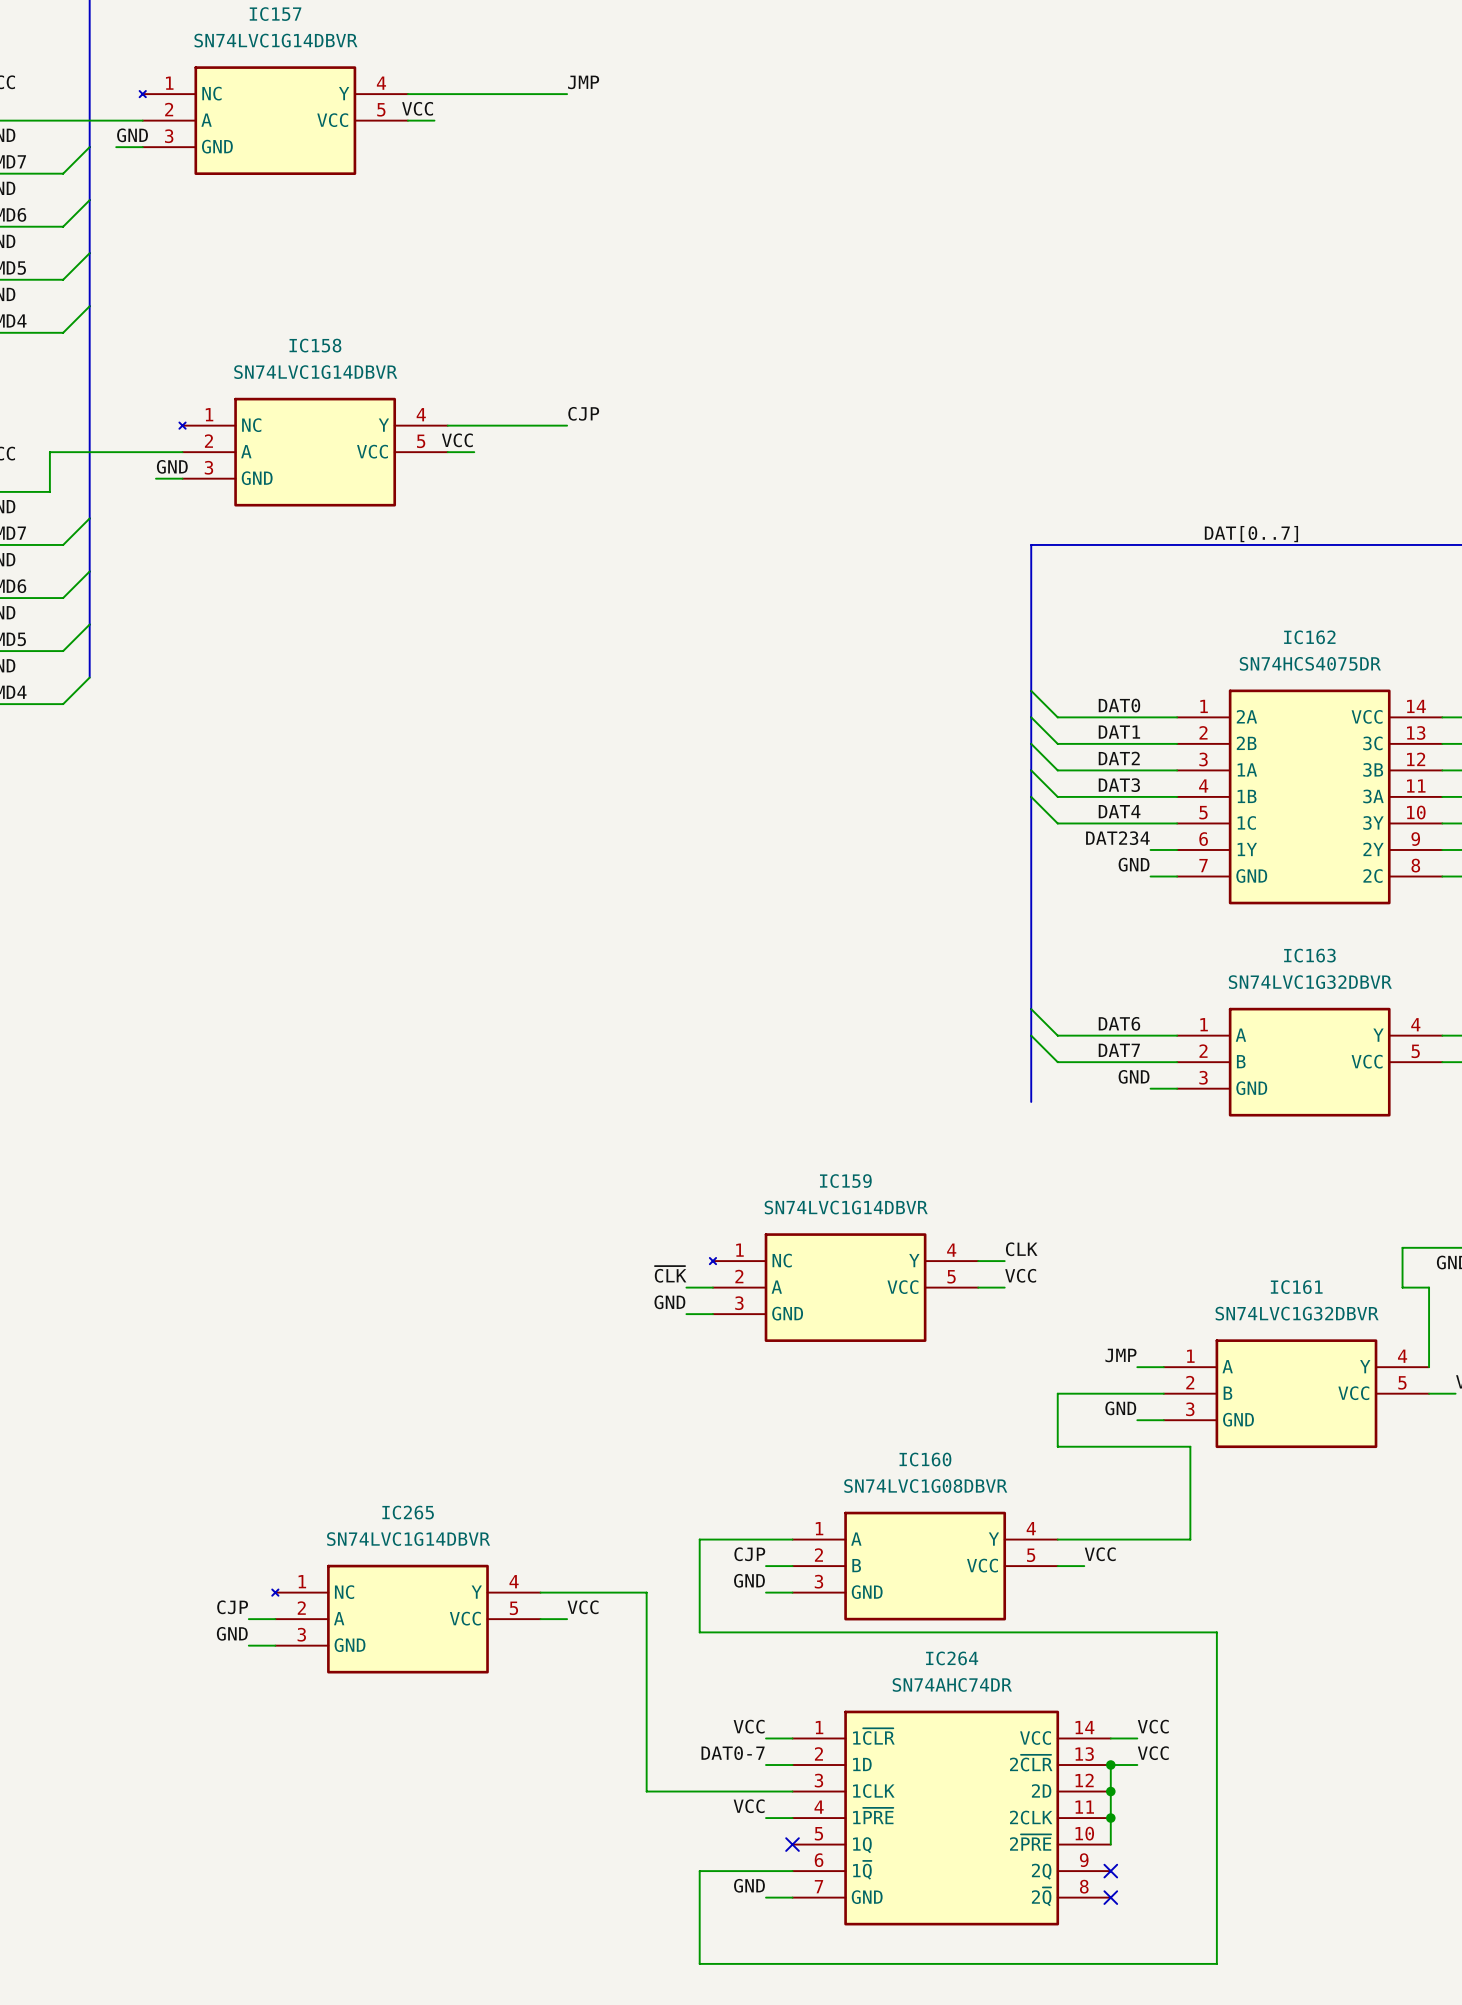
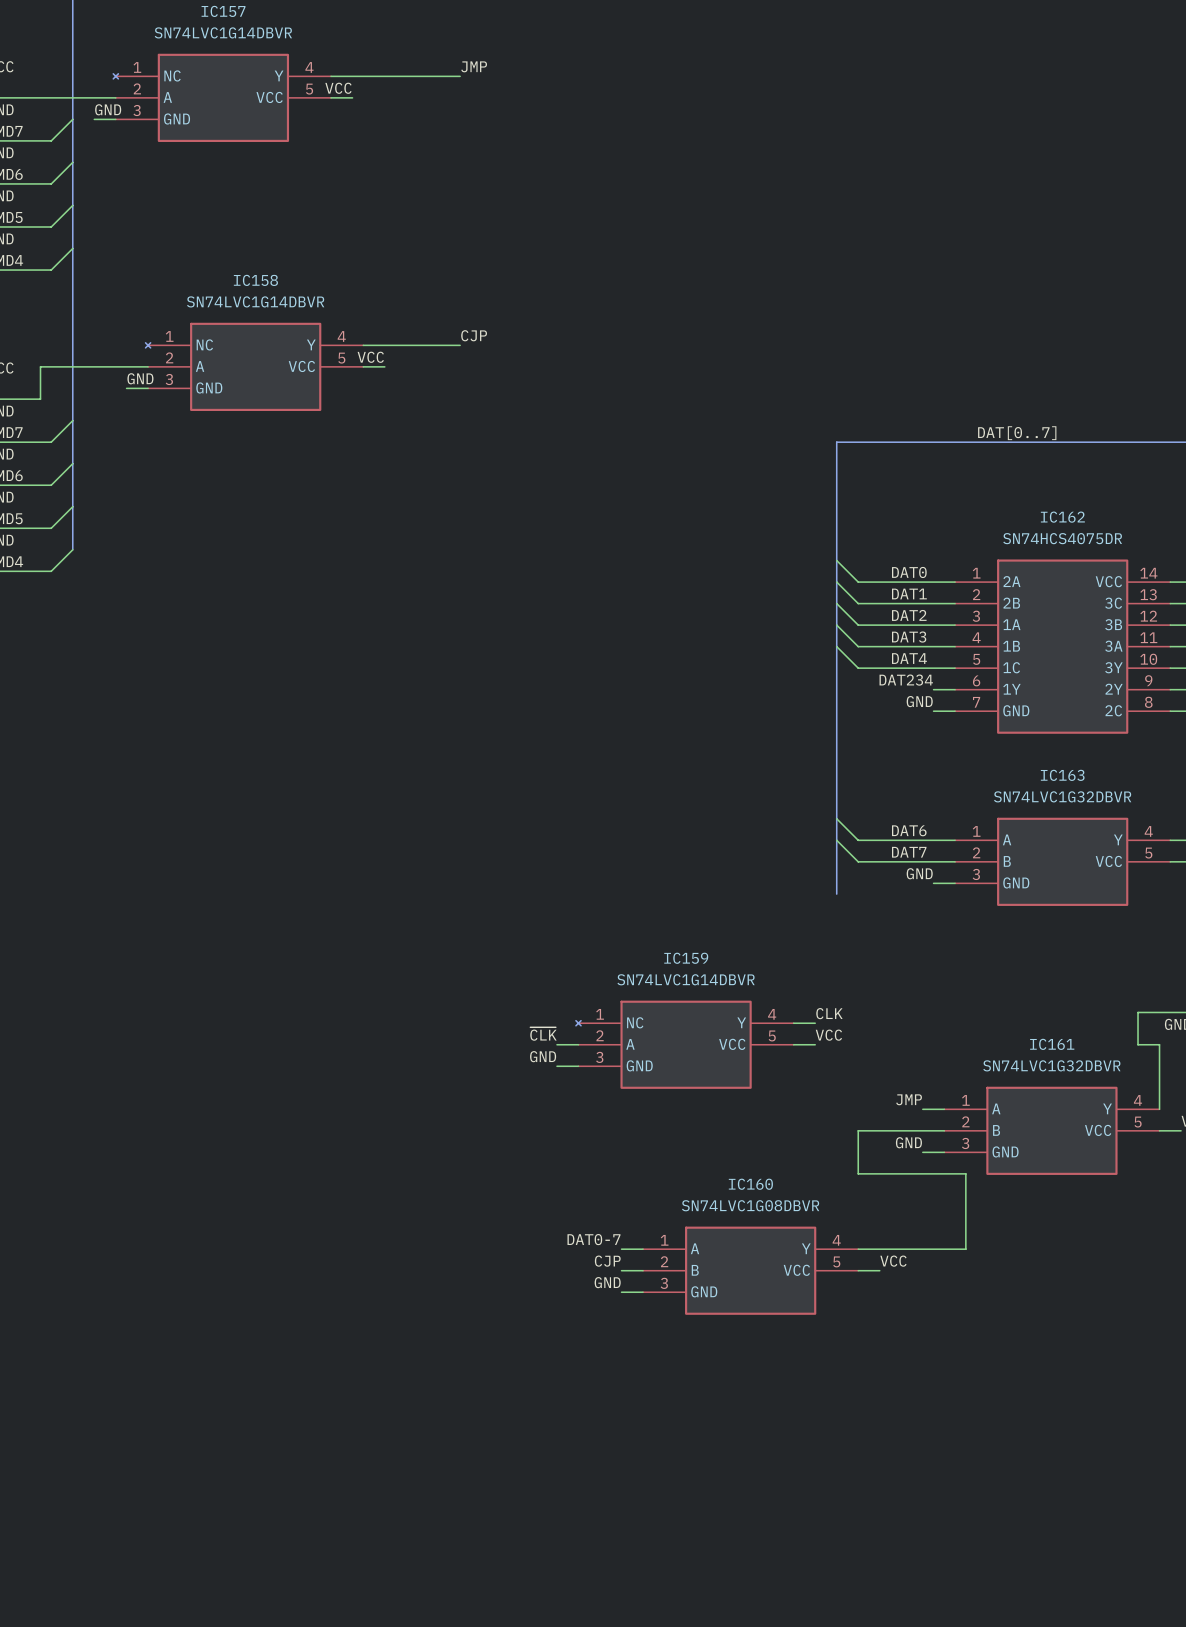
wire: (766, 1539) (699, 1539) (699, 1632) (1216, 1632) (1216, 1963) (699, 1963) (699, 1871) (792, 1871) -> none
wire: (540, 1592) (646, 1592) (646, 1791) (792, 1791) -> none
label: CJP (232, 1607) -> none
label: VCC (583, 1607) -> none
wire: (248, 1619) (275, 1619) -> none
IC265: SN74LVC1G14DBVR (406, 1619) -> none
wire: (540, 1619) (567, 1619) -> none
label: GND (232, 1633) -> none
wire: (248, 1645) (275, 1645) -> none
label: VCC (749, 1726) -> none
label: VCC (1153, 1726) -> none
wire: (766, 1738) (792, 1738) -> none
wire: (1110, 1738) (1137, 1738) -> none
label position: DAT0-7 (733, 1753) -> DAT0-7 (593, 1239)
label: VCC (1153, 1753) -> none
wire: (766, 1765) (792, 1765) -> none
junction: (1110, 1765) -> none
wire: (1137, 1765) (1110, 1765) (1110, 1844) -> none
junction: (1110, 1791) -> none
label: VCC (749, 1806) -> none
wire: (766, 1818) (792, 1818) -> none
IC264: SN74AHC74DR (951, 1818) -> none
junction: (1110, 1818) -> none
no-connect mark: (792, 1844) -> none
no-connect mark: (1110, 1871) -> none
label: GND (749, 1885) -> none
wire: (766, 1897) (792, 1897) -> none
no-connect mark: (1110, 1897) -> none

